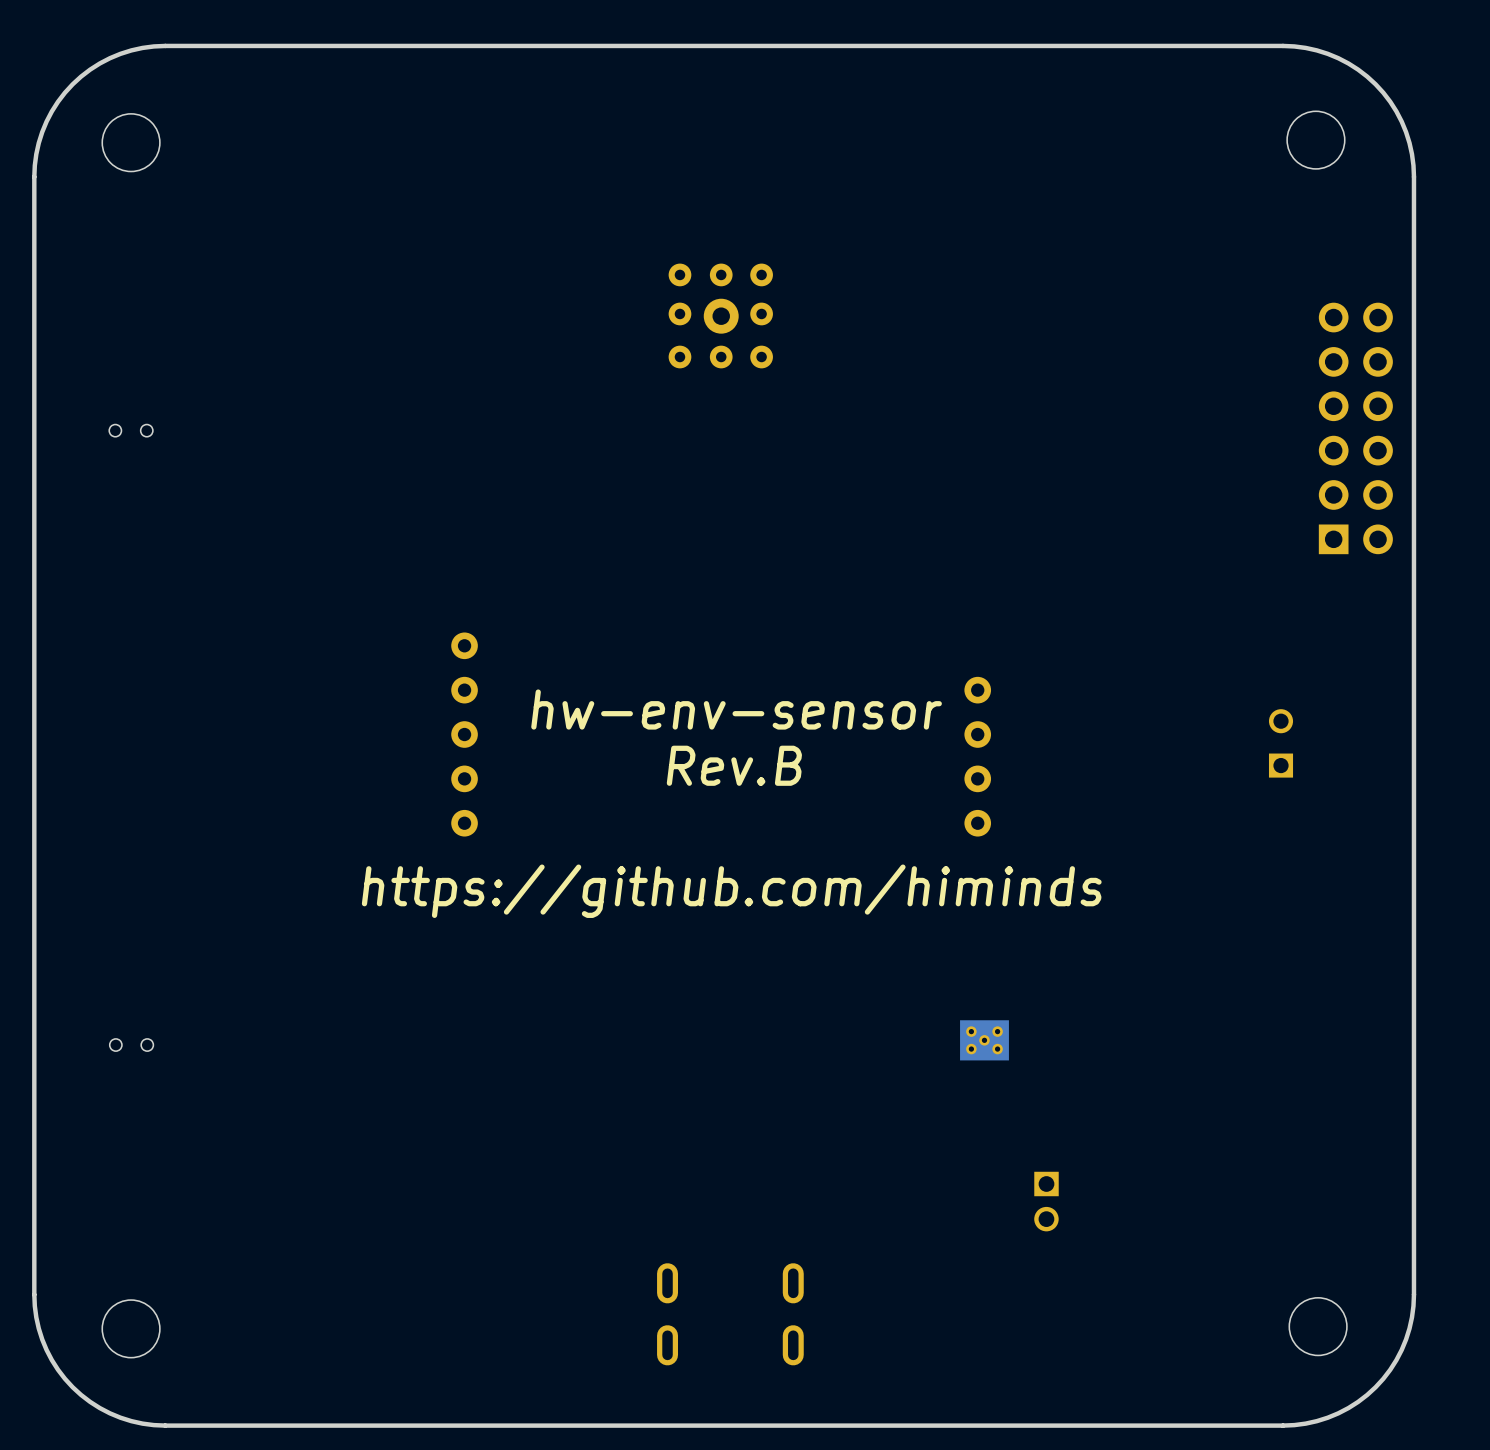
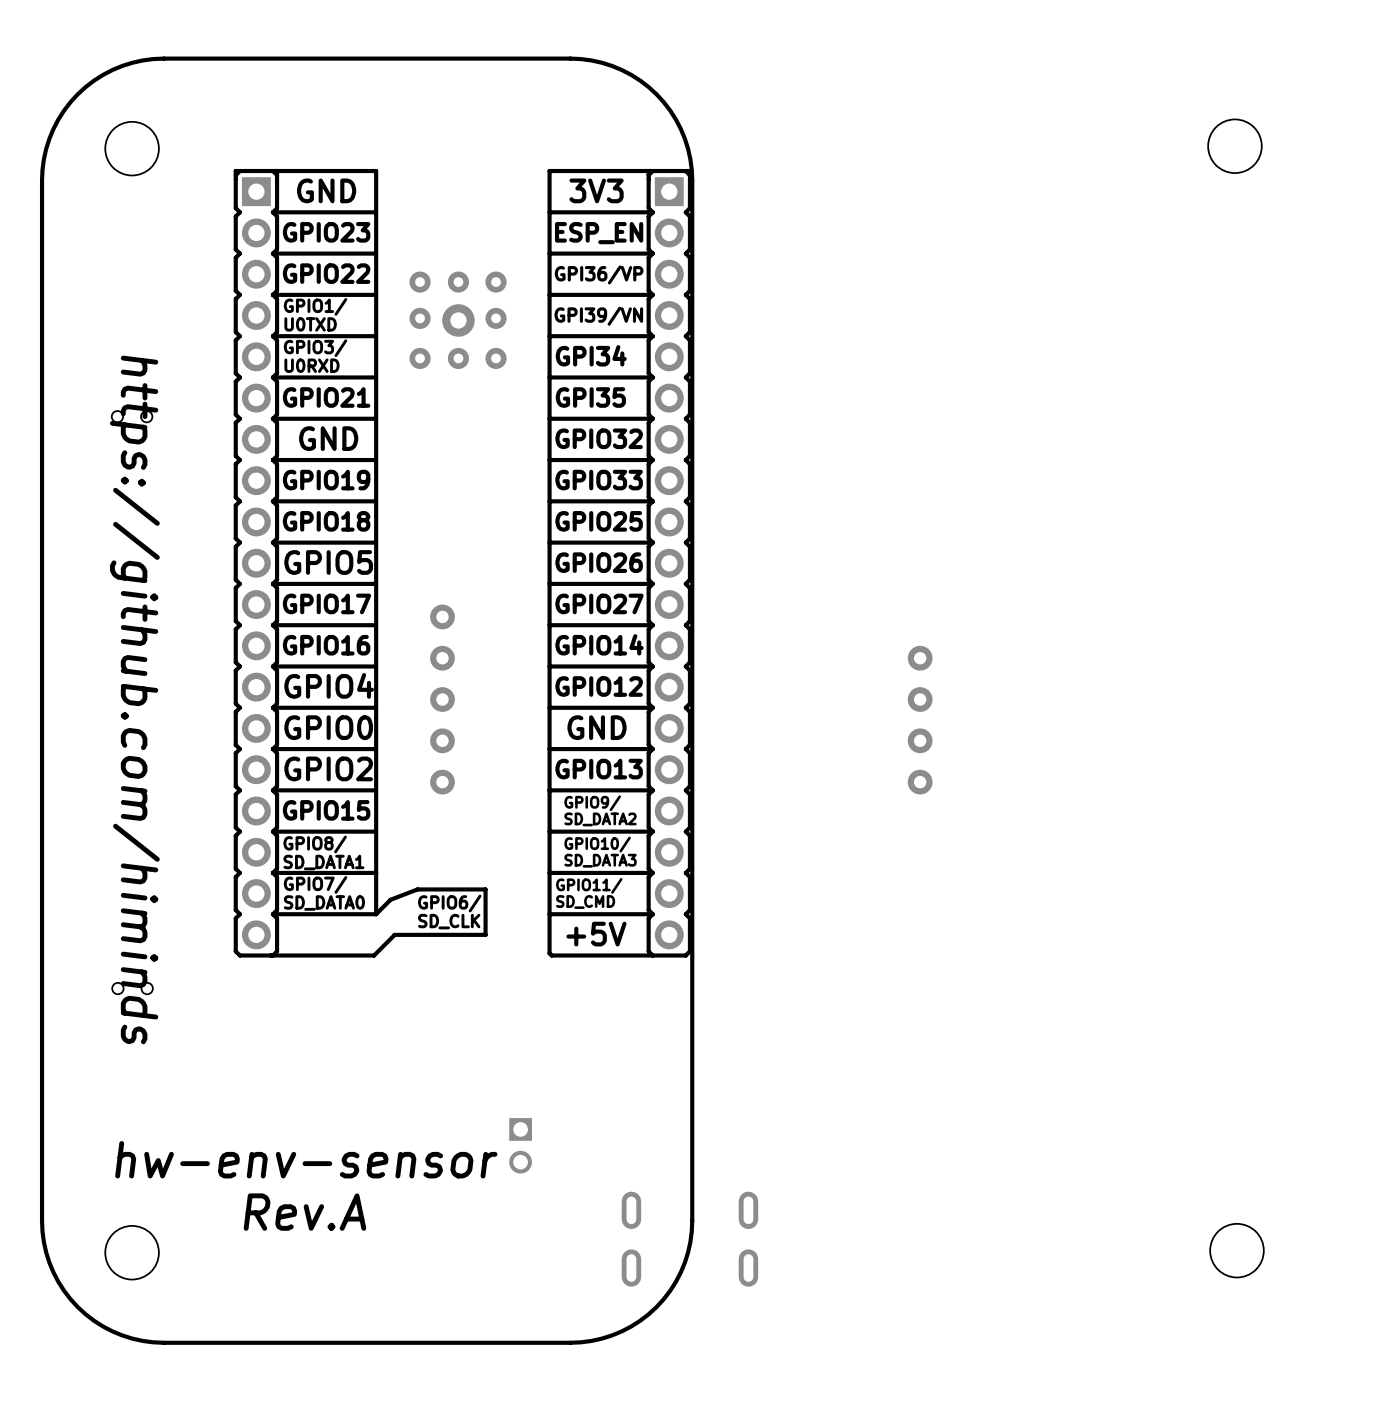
board edge: (601, 45) (1282, 45) (1305, 47) (1327, 53) (1348, 63) (1367, 76) (1383, 92) (1396, 111) (1406, 132) (1411, 154) (1413, 176) (1413, 1294) (1411, 1317) (1406, 1339) (1390, 1369) (1367, 1394) (1348, 1408) (1316, 1421) (1294, 1425) (601, 1425) -> (570, 58) (591, 60) (612, 65) (640, 80) (656, 94) (670, 110) (680, 128) (690, 159) (692, 180) (691, 1231) (688, 1252) (680, 1272) (663, 1299) (648, 1314) (631, 1326) (612, 1335) (591, 1340) (570, 1342)
line: none -> (272, 171) (376, 171) (376, 914)
line: none -> (652, 171) (549, 171) (549, 953) (551, 955) (652, 955)
text: none -> GND (326, 190)
text: none -> 3V3 (596, 190)
line: none -> (376, 212) (272, 212)
line: none -> (652, 212) (549, 212)
text: none -> GPIO23 (326, 232)
text: none -> ESP_EN (599, 233)
line: none -> (376, 253) (272, 253)
line: none -> (652, 253) (549, 253)
text: none -> GPIO22 (326, 273)
text: none -> GPI36/VP (599, 274)
line: none -> (376, 294) (272, 294)
line: none -> (652, 294) (549, 294)
text: none -> GPIO1/ (315, 306)
part position: (720, 315) -> (458, 320)
text: none -> GPI39/VN (598, 316)
text: none -> U0TXD (310, 324)
line: none -> (376, 336) (272, 336)
line: none -> (652, 336) (549, 336)
text: none -> GPIO3/ (315, 348)
text: none -> GPI34 (591, 355)
text: none -> U0RXD (311, 365)
line: none -> (376, 377) (272, 377)
line: none -> (652, 377) (549, 377)
text: none -> GPIO21 (326, 397)
text: none -> GPI35 (590, 397)
part: (1355, 428) -> none
line: none -> (376, 418) (272, 418)
line: none -> (652, 418) (549, 418)
text: none -> GND (328, 438)
text: none -> GPIO32 (599, 438)
line: none -> (376, 460) (272, 460)
line: none -> (652, 460) (549, 460)
text: none -> GPIO19 (326, 480)
text: none -> GPIO33 (599, 480)
line: none -> (376, 501) (272, 501)
line: none -> (652, 501) (549, 501)
text: none -> GPIO18 (326, 521)
text: none -> GPIO25 (599, 521)
line: none -> (376, 542) (272, 542)
line: none -> (652, 542) (549, 542)
text: none -> GPIO5 (328, 562)
text: none -> GPIO26 (599, 562)
part: none -> (256, 563)
part: none -> (669, 563)
line: none -> (376, 583) (272, 583)
line: none -> (652, 583) (549, 583)
text: none -> GPIO17 (326, 603)
text: none -> GPIO27 (599, 603)
line: none -> (376, 625) (272, 625)
line: none -> (652, 625) (549, 625)
text: none -> GPIO14 (599, 644)
text: none -> GPIO16 (326, 645)
line: none -> (376, 666) (272, 666)
line: none -> (652, 666) (549, 666)
text: hw-env-sensor (736, 709) -> none
text: none -> GPIO4 (329, 685)
text: none -> GPIO12 (599, 686)
text: none -> https://github.com/himinds (134, 699)
line: none -> (376, 707) (272, 707)
line: none -> (652, 707) (549, 707)
part: (1281, 743) -> none
text: none -> GPIO0 (328, 727)
text: none -> GND (597, 727)
text: Rev.B (734, 765) -> none
line: none -> (376, 749) (272, 749)
line: none -> (652, 749) (549, 749)
text: none -> GPIO2 (328, 768)
text: none -> GPIO13 (599, 769)
line: none -> (376, 790) (272, 790)
line: none -> (652, 790) (549, 790)
text: none -> GPIO9/ (592, 803)
text: none -> GPIO15 (326, 810)
text: none -> SD_DATA2 (600, 819)
line: none -> (376, 831) (272, 831)
line: none -> (652, 831) (549, 831)
text: none -> GPIO8/ (315, 844)
text: none -> GPIO10/ (597, 844)
text: https://github.com/himinds (731, 891) -> none
text: none -> SD_DATA3 (600, 860)
text: none -> SD_DATA1 (323, 862)
line: none -> (376, 872) (272, 872)
line: none -> (652, 872) (549, 872)
text: none -> GPIO7/ (315, 884)
text: none -> GPIO11/ (589, 885)
text: none -> SD_CMD (585, 901)
text: none -> SD_DATA0 (324, 903)
text: none -> GPIO6/ (449, 903)
line: none -> (376, 914) (390, 899) (417, 889) (485, 889) (485, 934) (394, 934) (374, 955) (270, 955)
line: none -> (376, 914) (272, 914)
line: none -> (652, 914) (549, 914)
text: none -> SD_CLK (449, 921)
text: none -> +5V (596, 934)
part: (984, 1040) -> none
part: (1046, 1201) -> none
part: none -> (520, 1145)
text: none -> hw-env-sensor (306, 1159)
text: none -> Rev.A (304, 1212)

